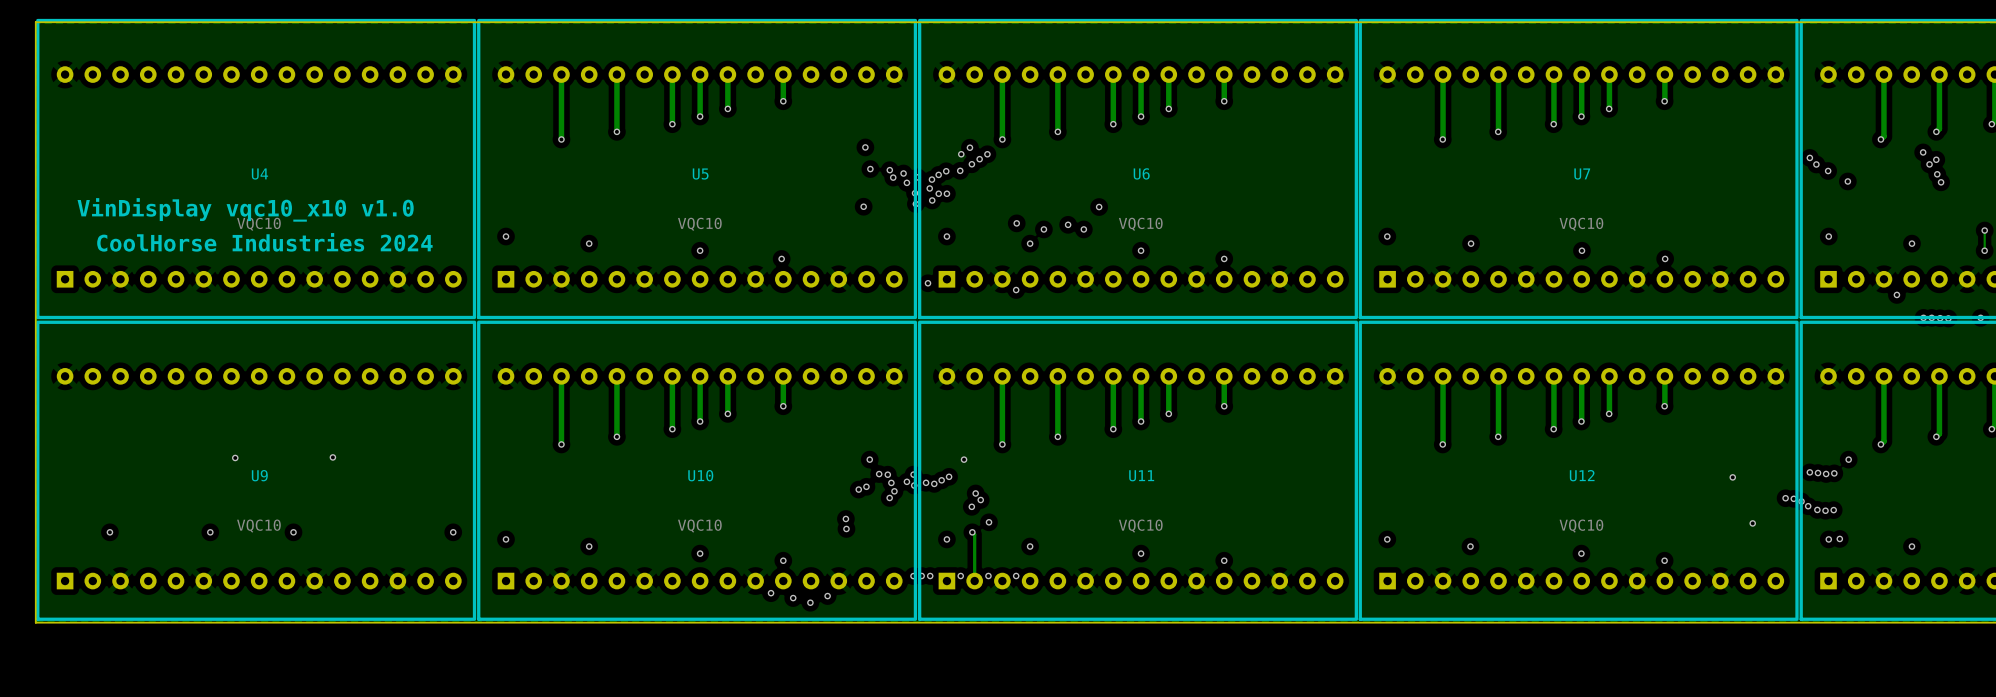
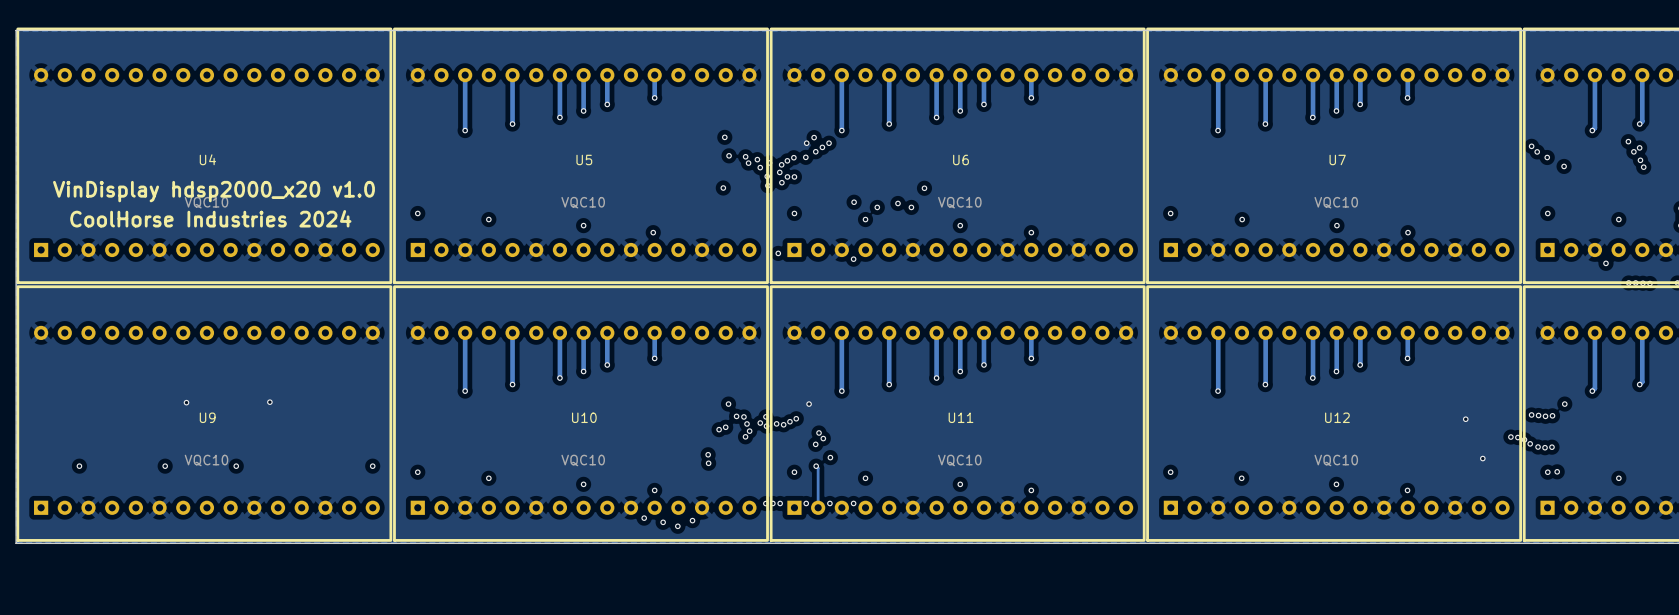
text: VinDisplay vqc10_x10 v1.0 (245, 209) -> VinDisplay hdsp2000_x20 v1.0 (213, 191)

